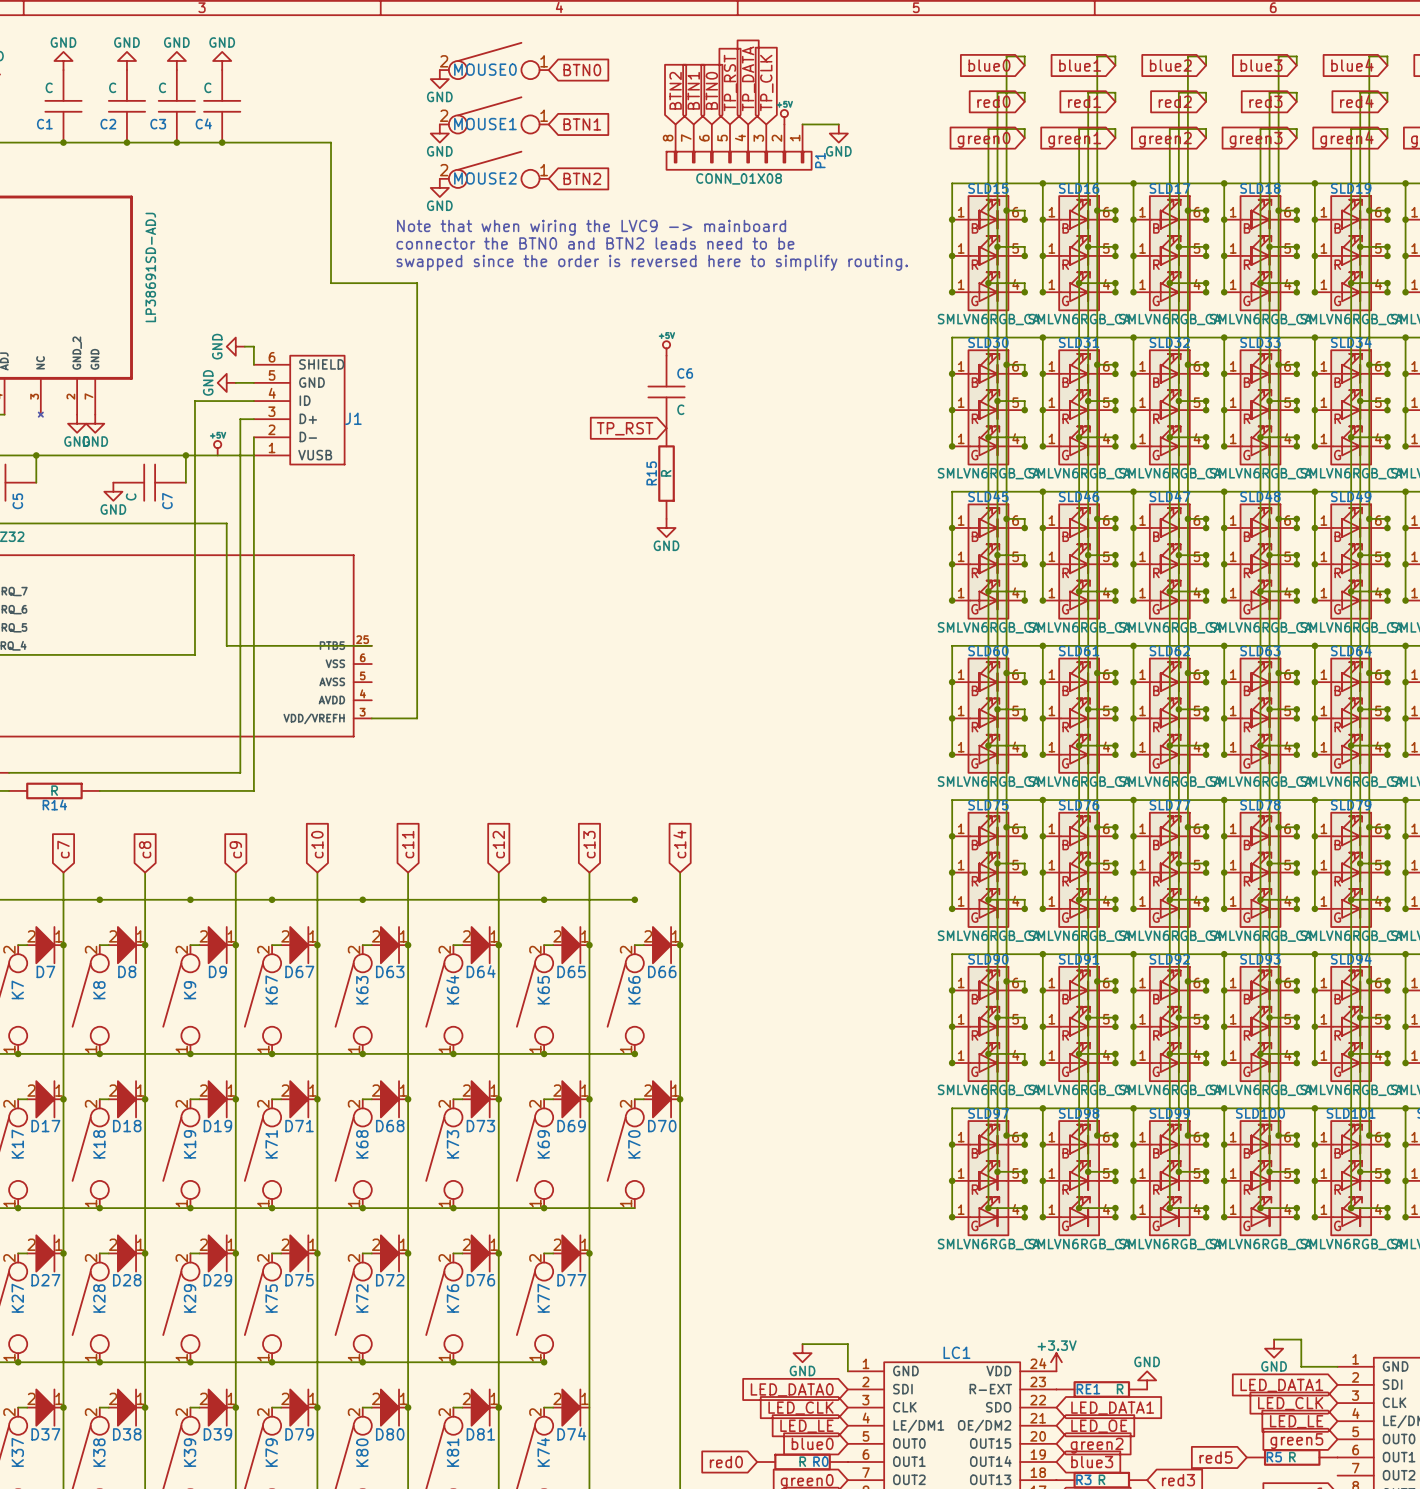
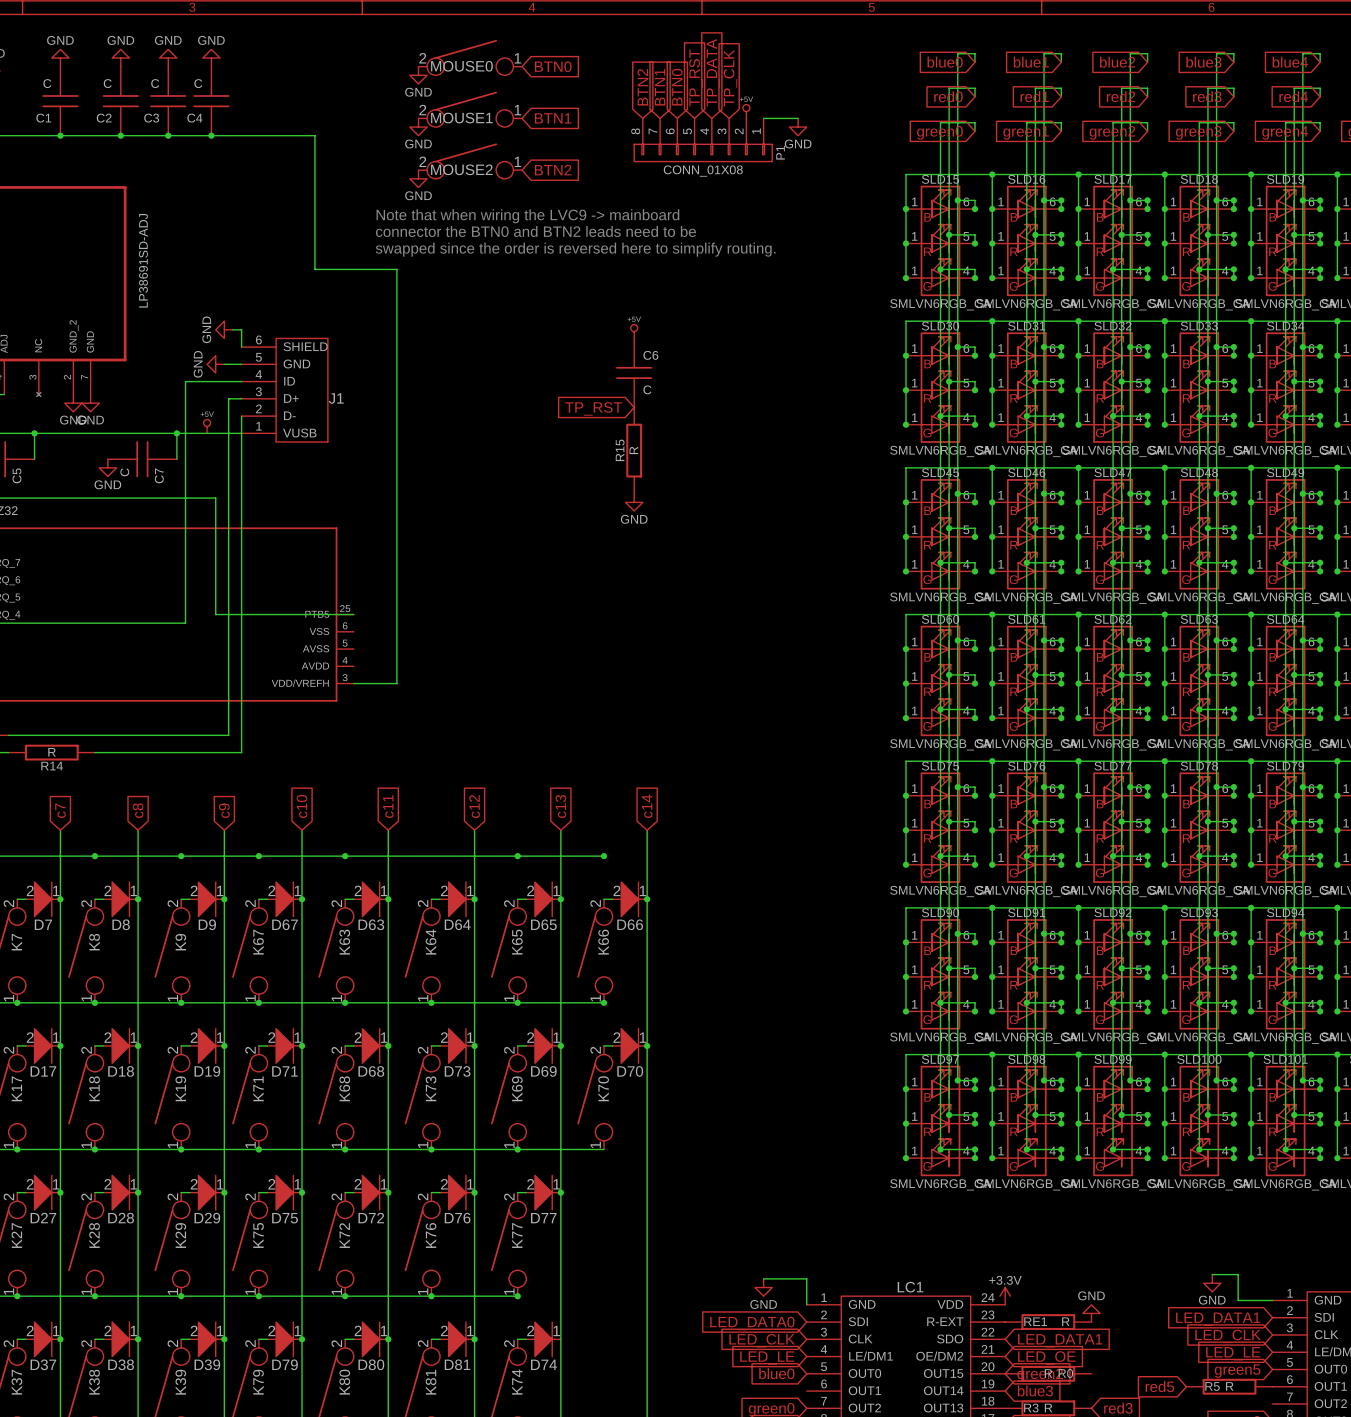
global label: red0 (726, 1462) -> none
R0 position: (802, 1462) -> (1048, 1373)

